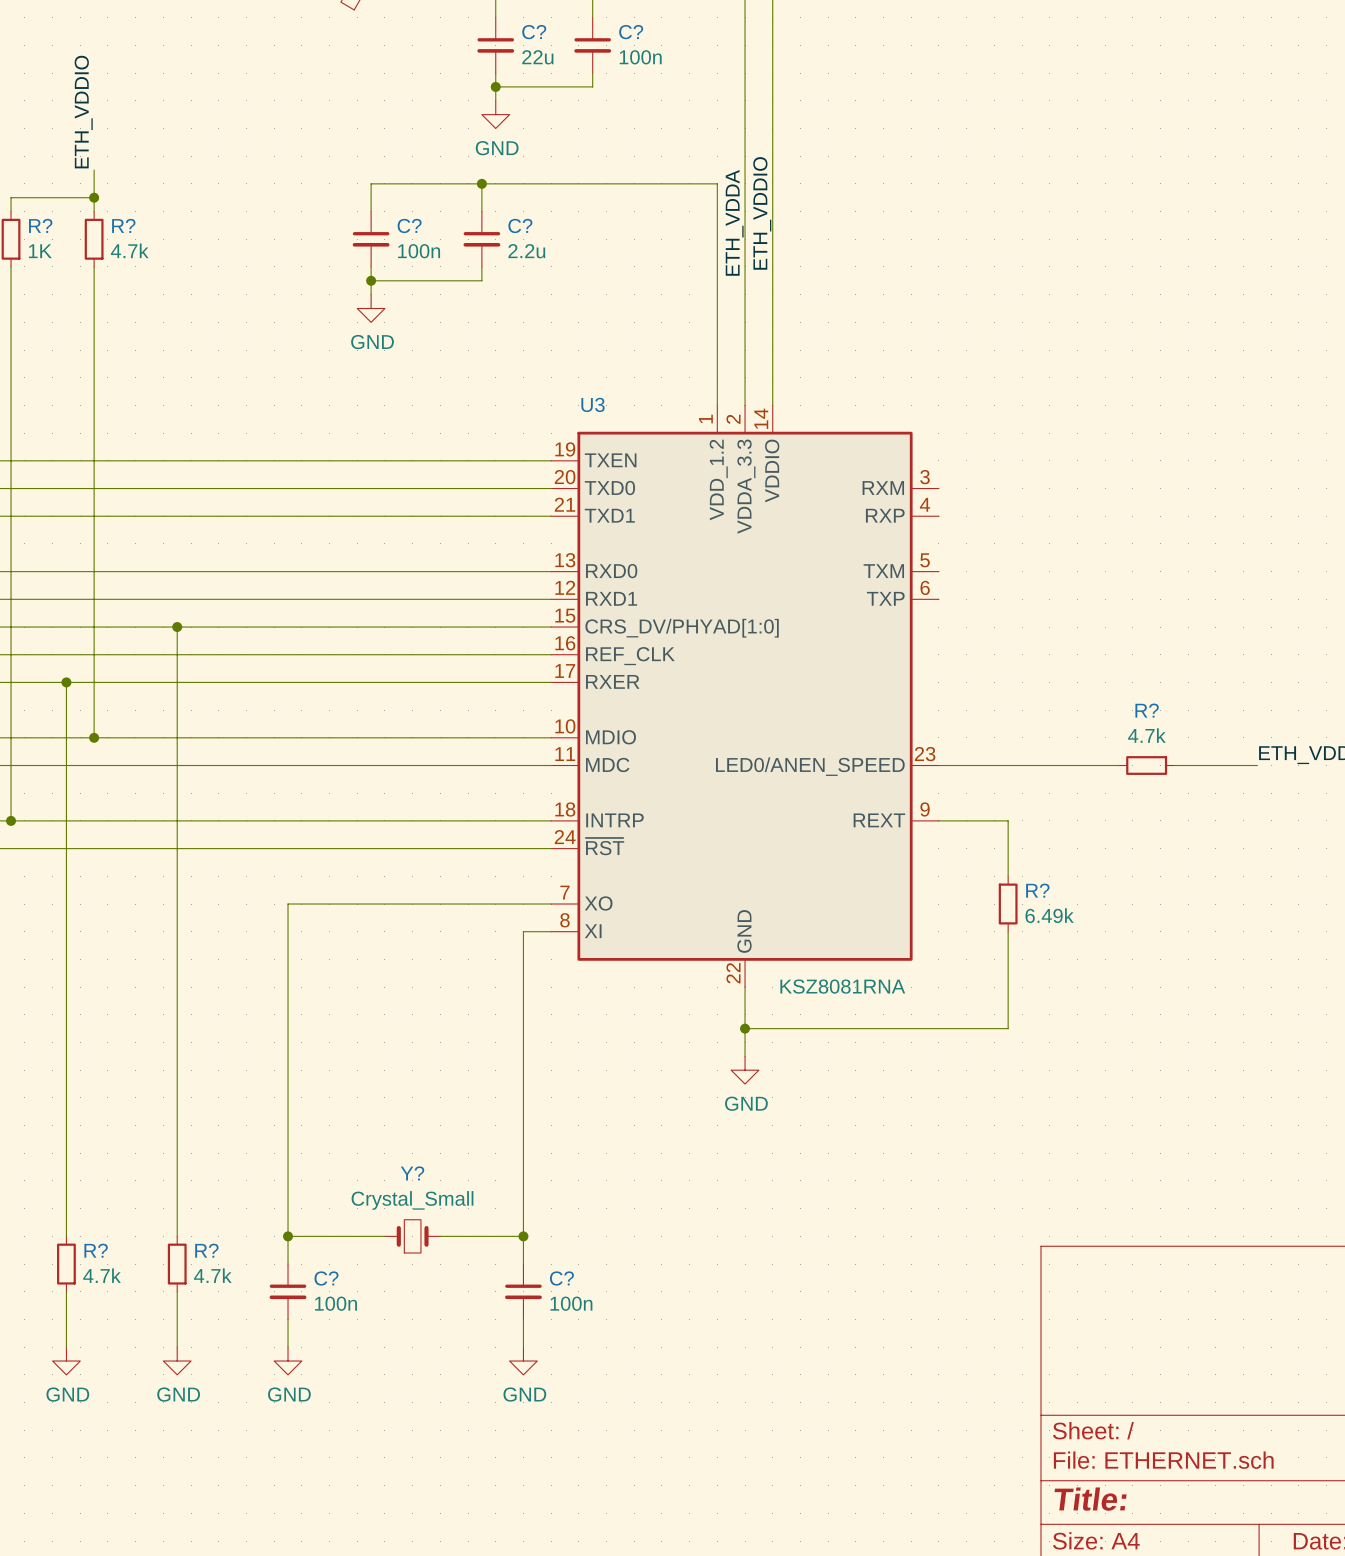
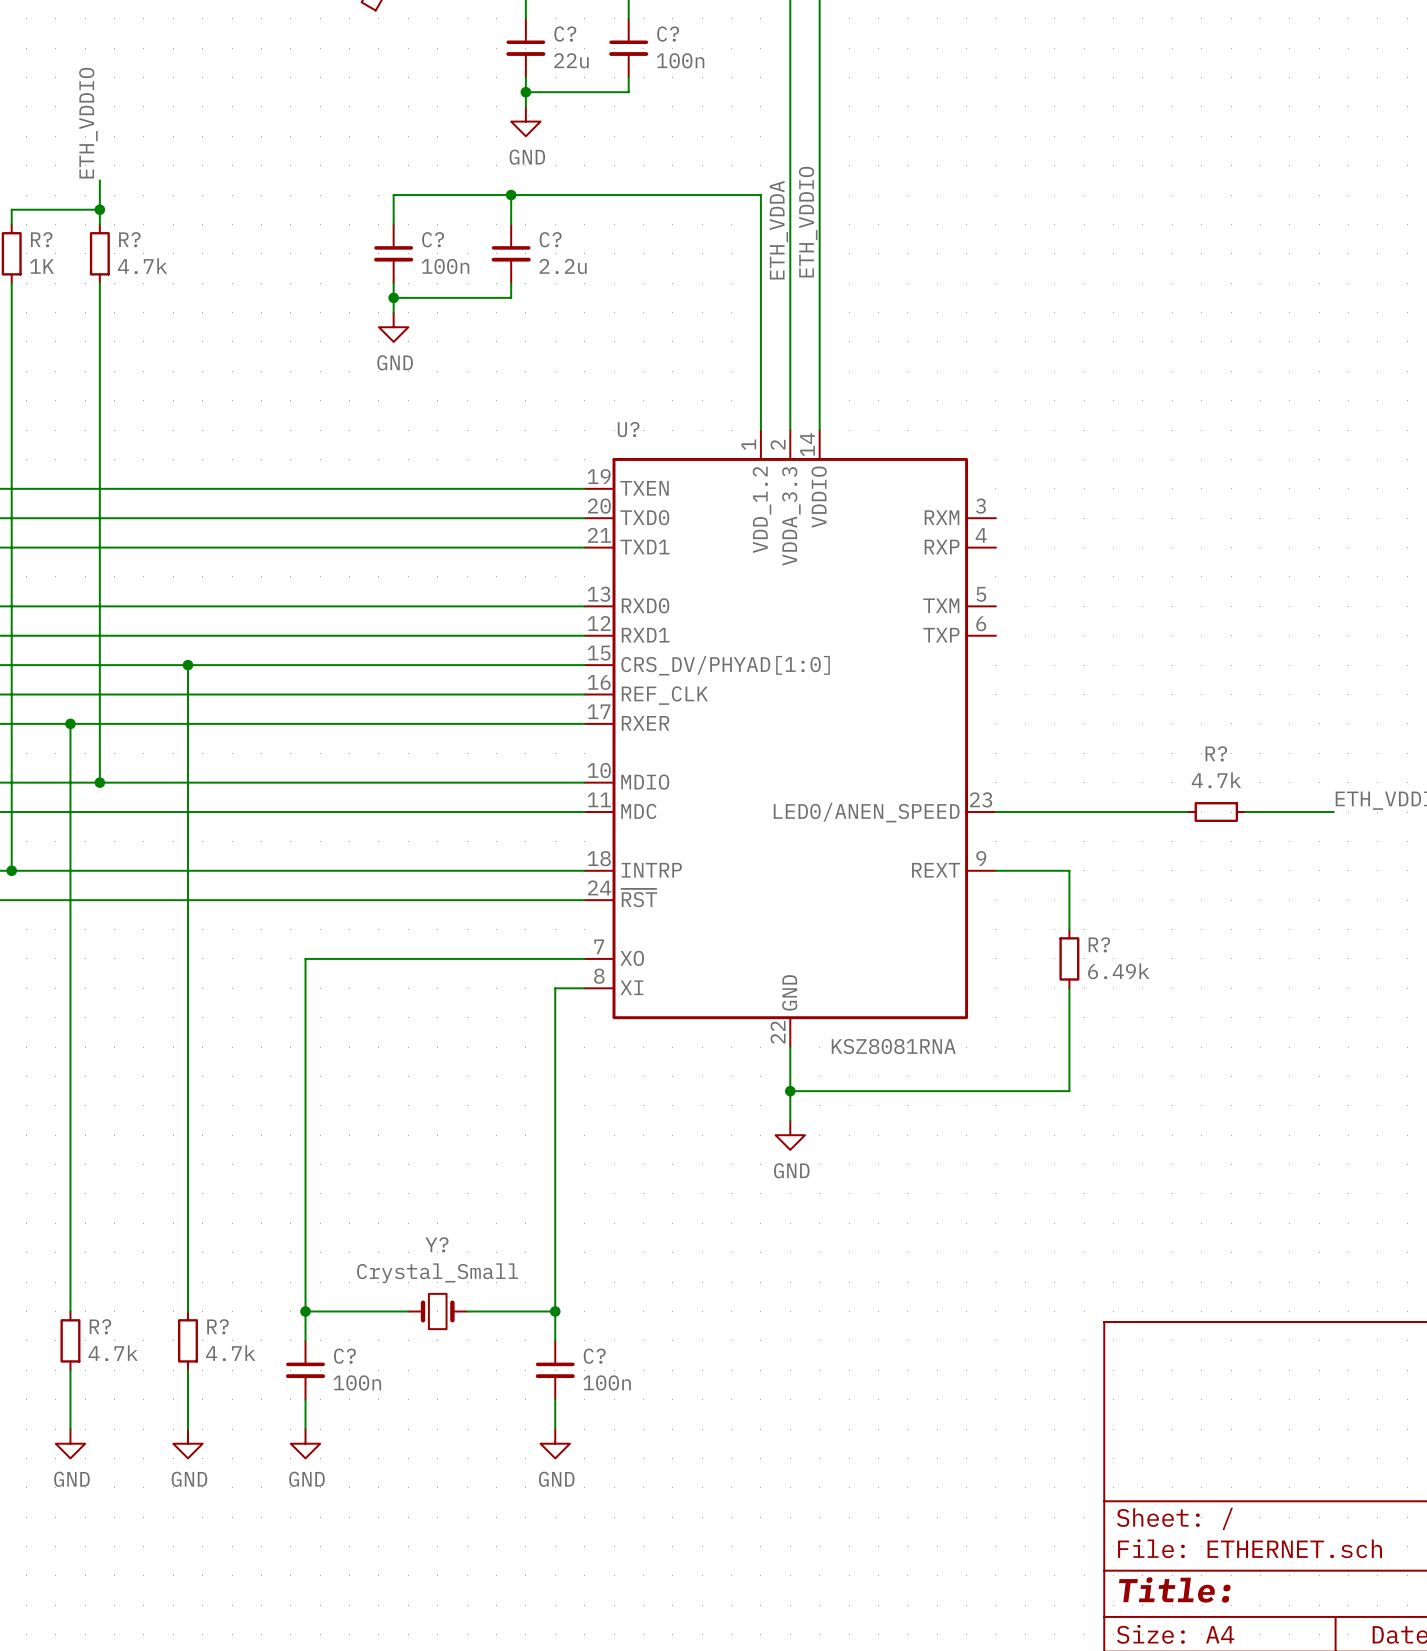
U3 name: U3 (593, 404) -> U? (628, 429)

